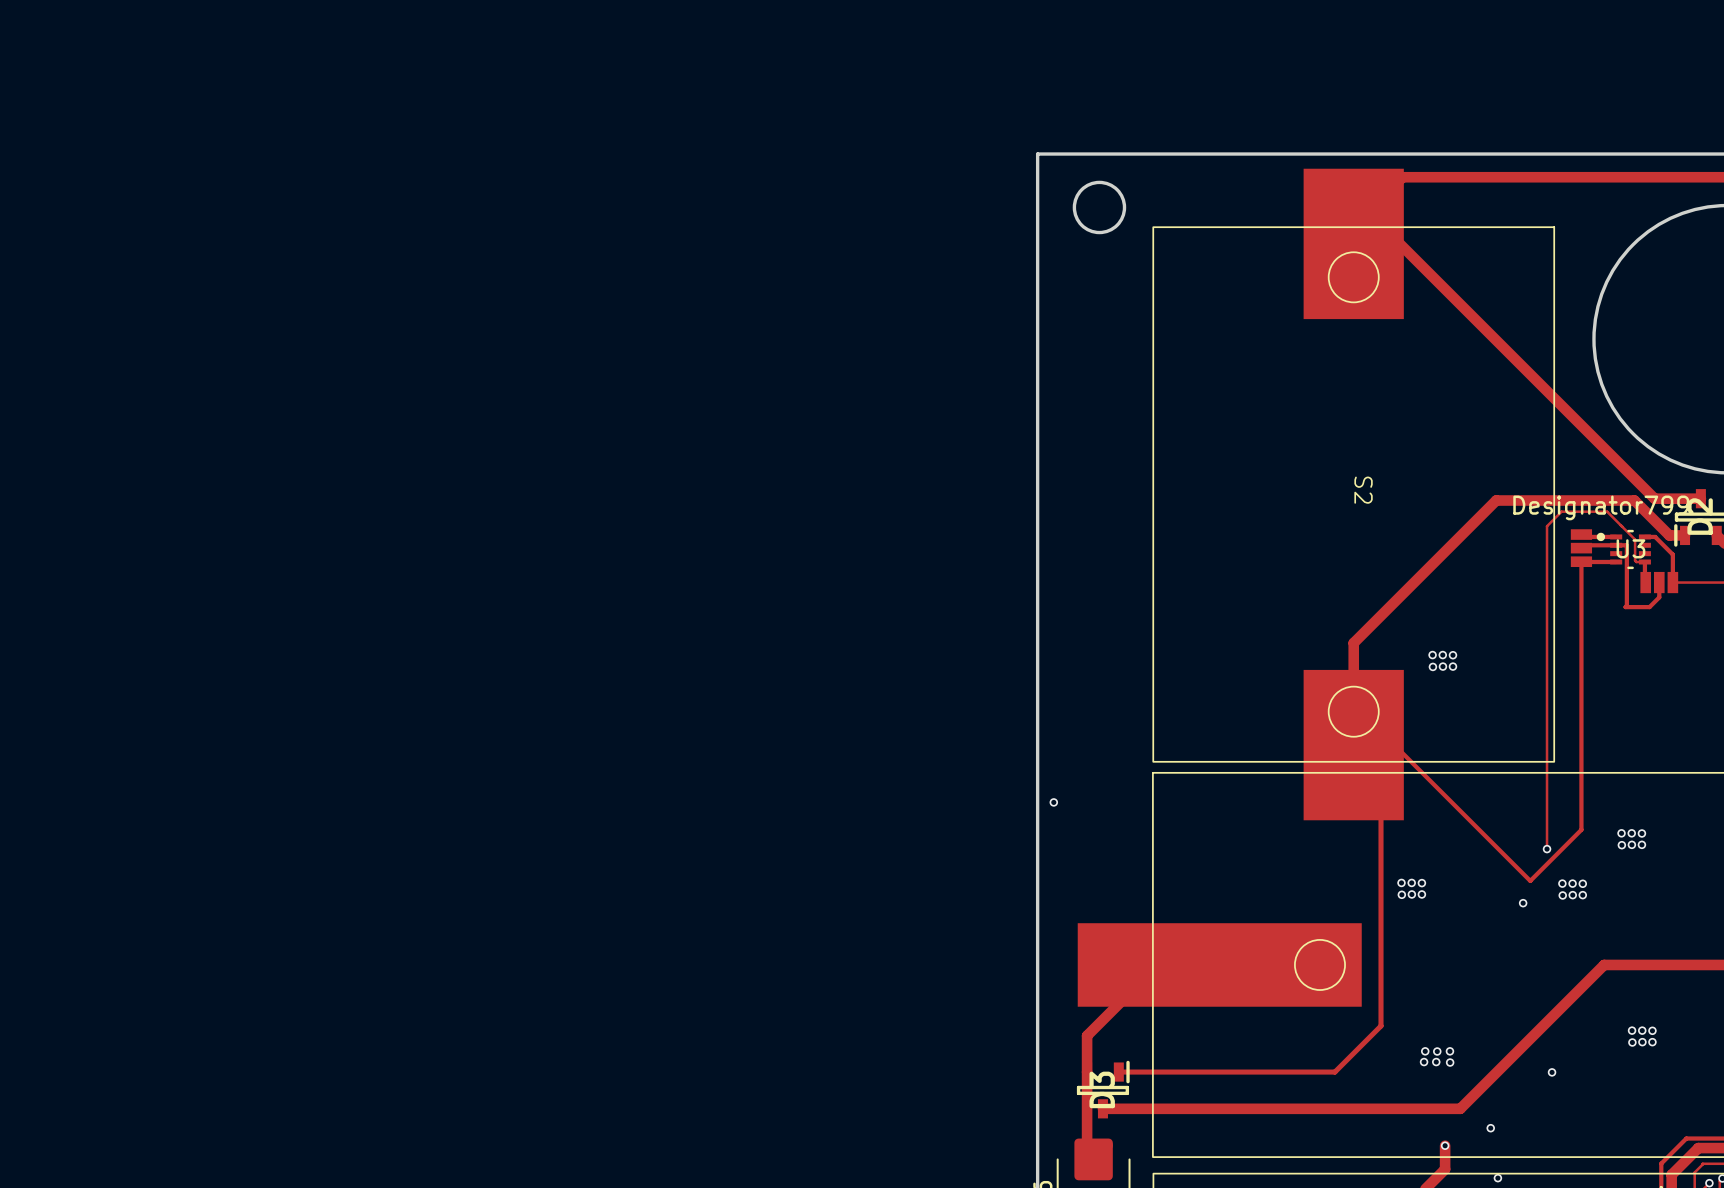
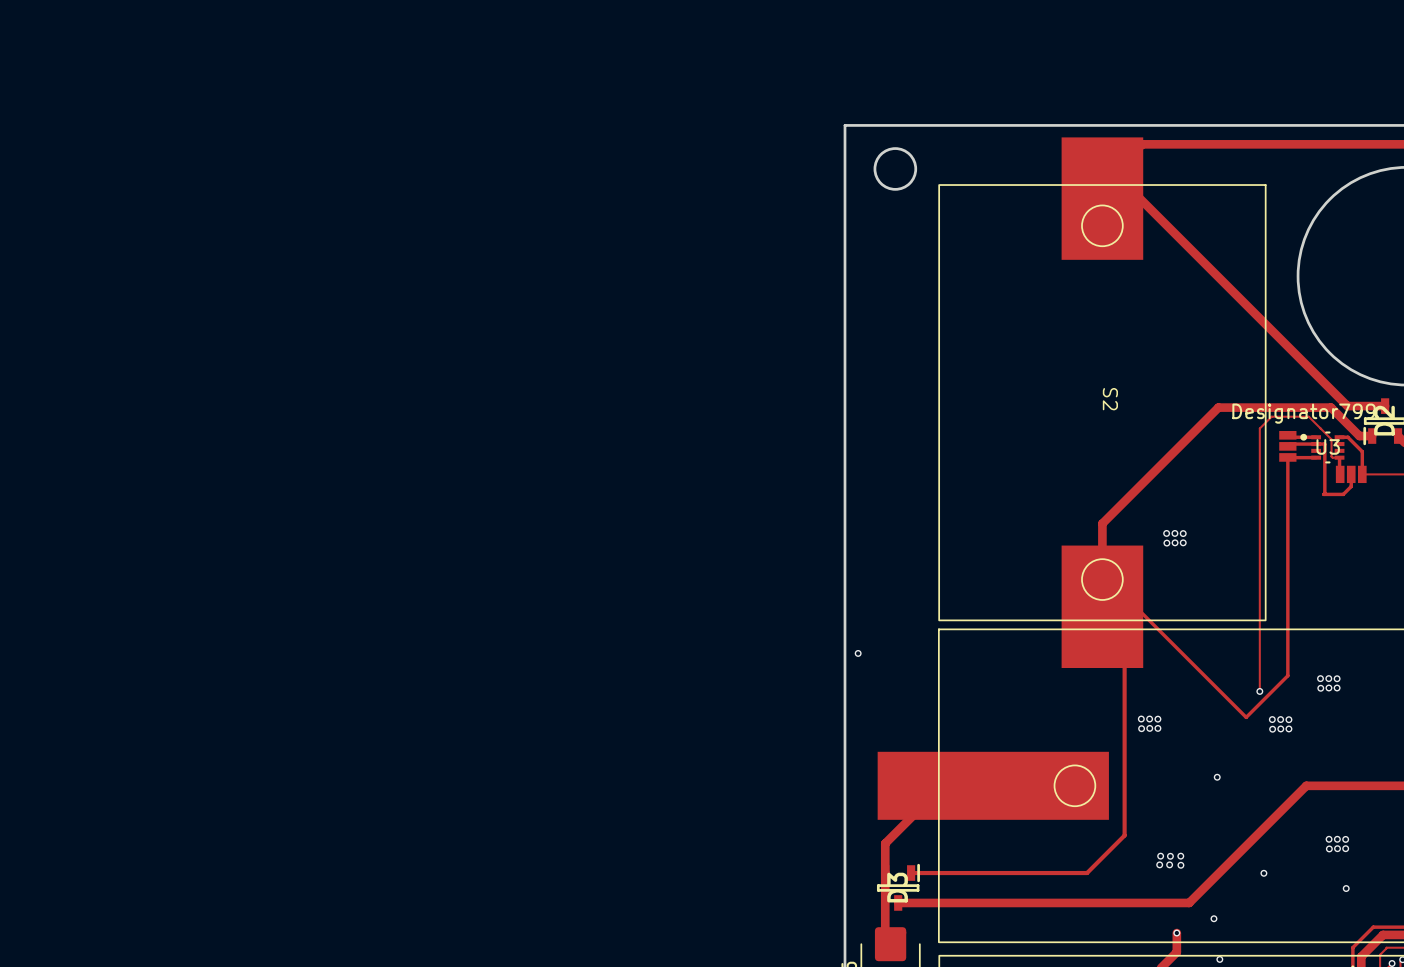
via: (1523, 903) -> none
via: none -> (1217, 777)
via: none -> (1346, 888)

